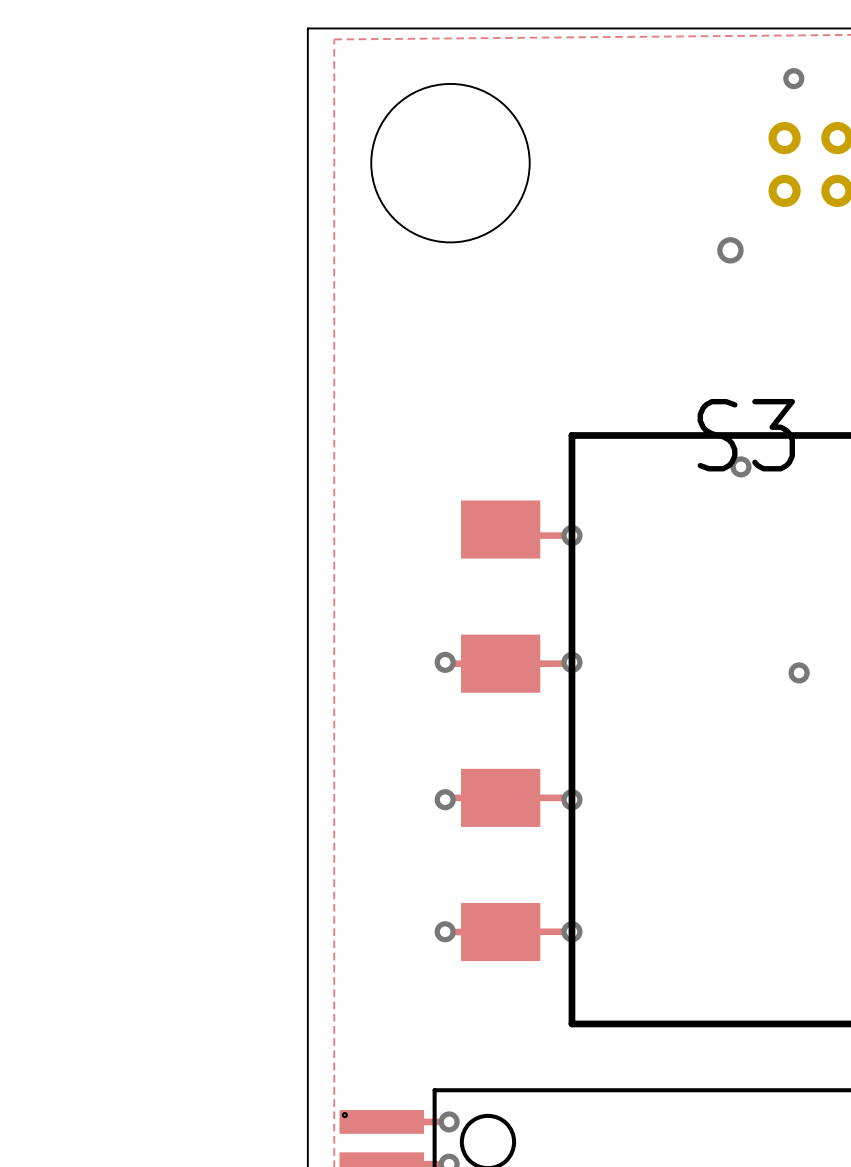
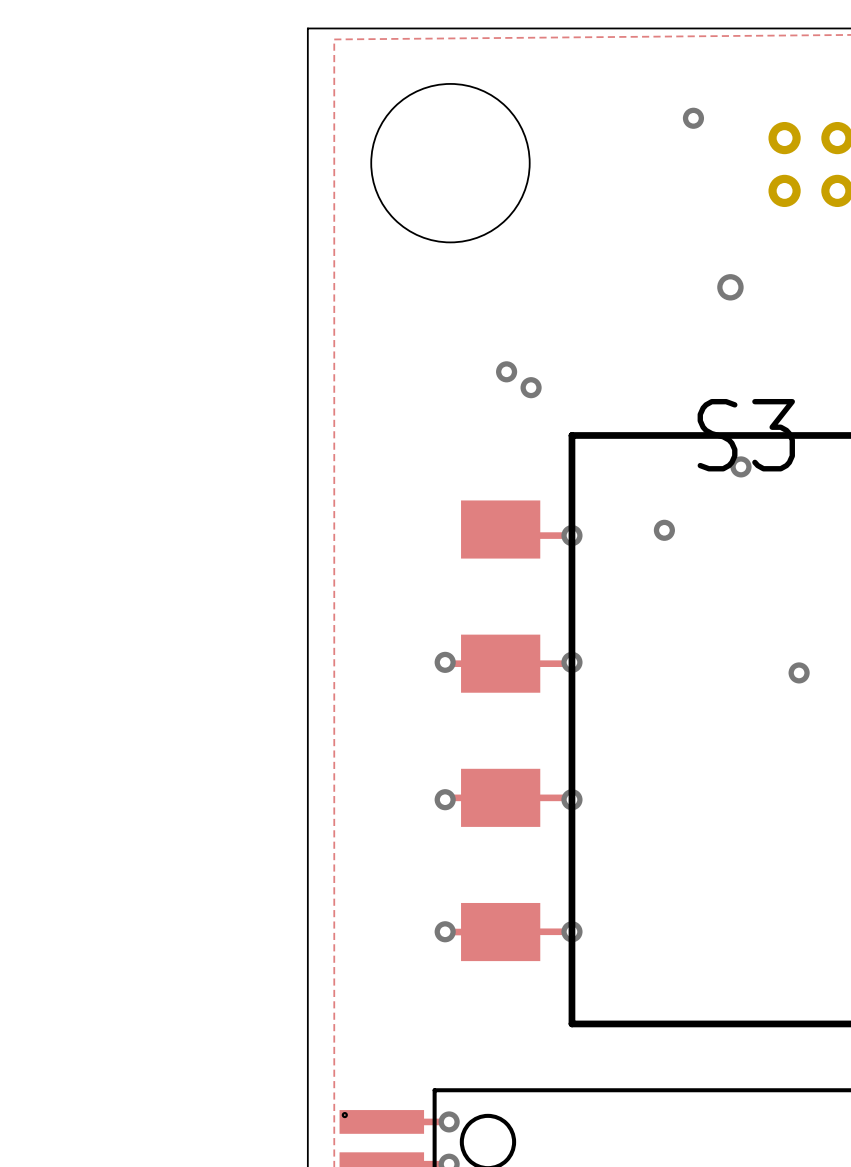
via position: (793, 78) -> (693, 118)
via position: (730, 250) -> (730, 287)
via: none -> (506, 371)
via: none -> (531, 387)
via: none -> (664, 530)

